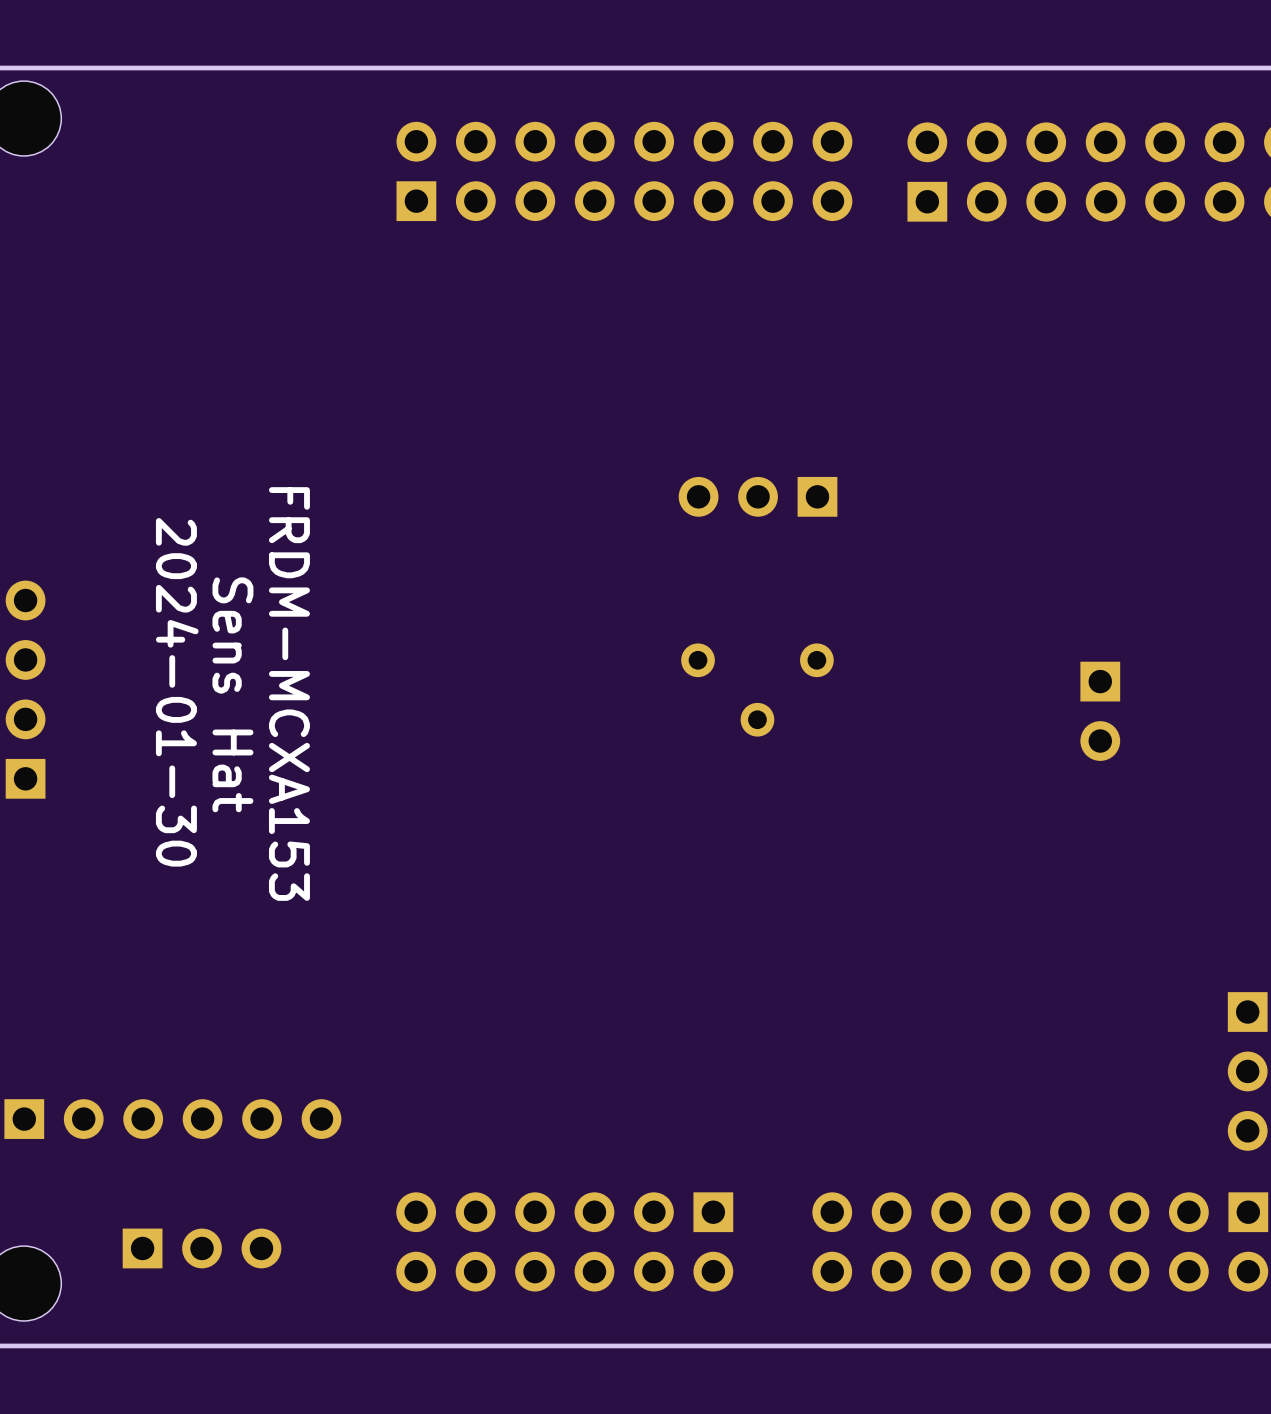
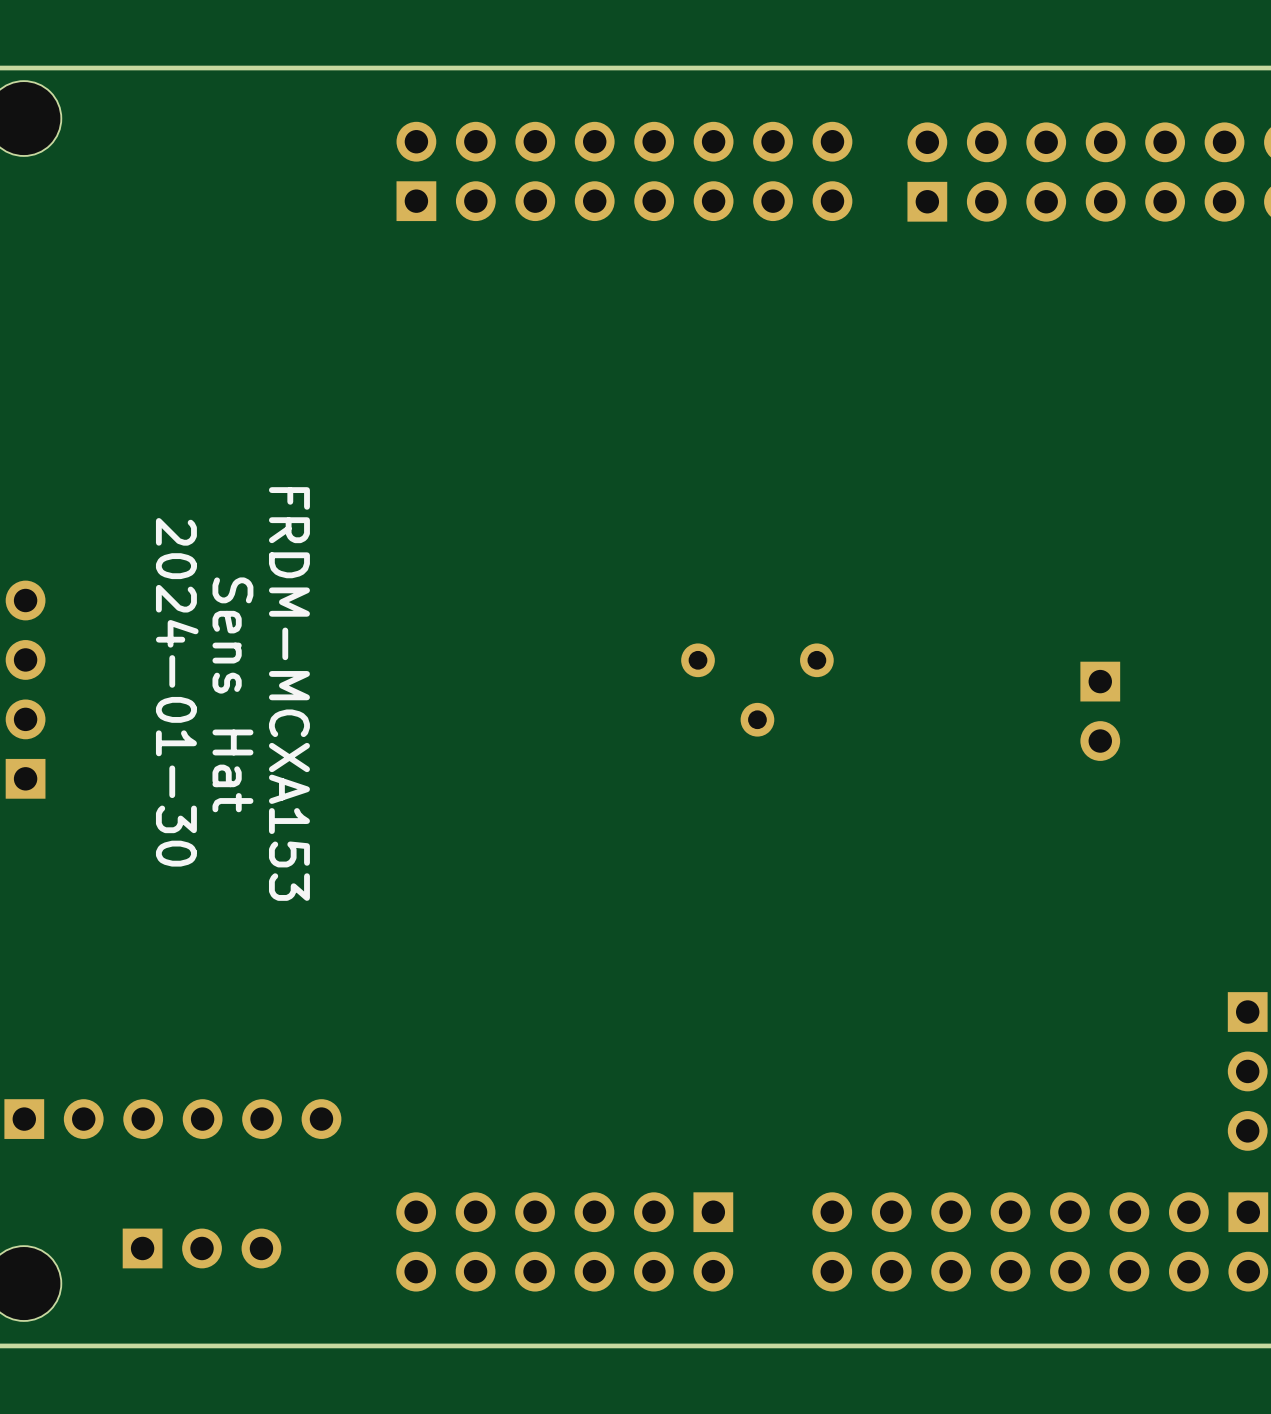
part: (758, 496) -> none

